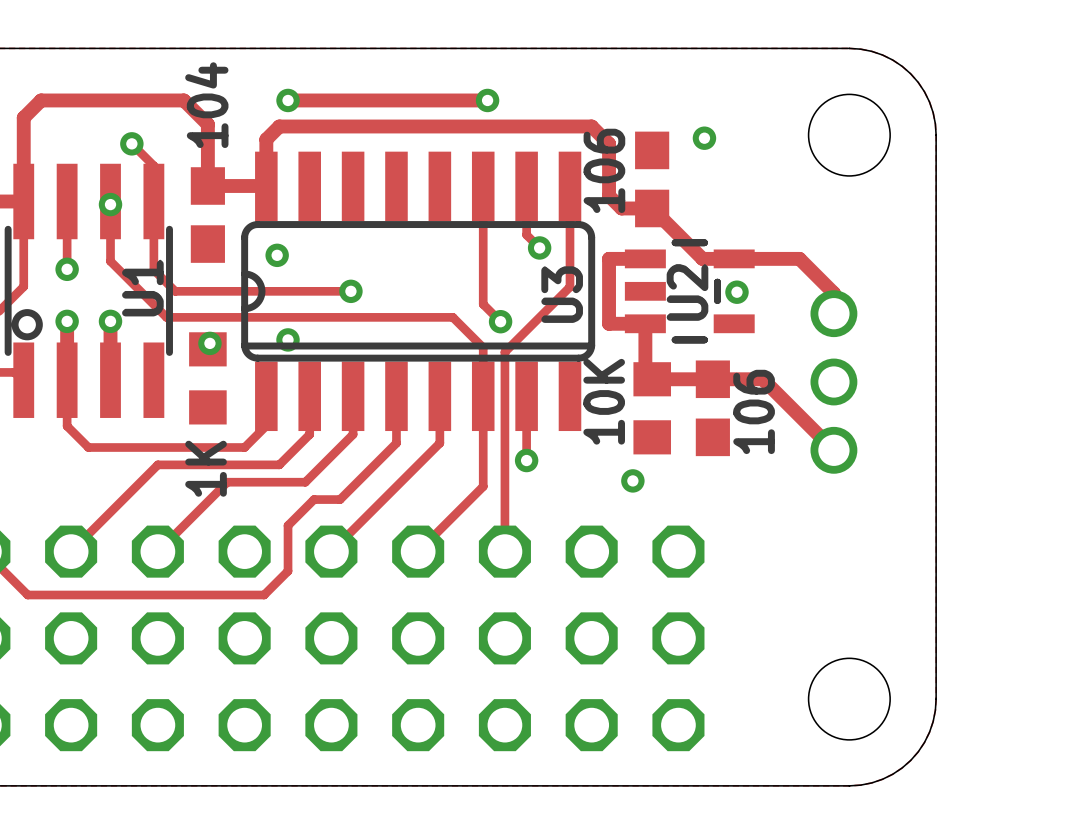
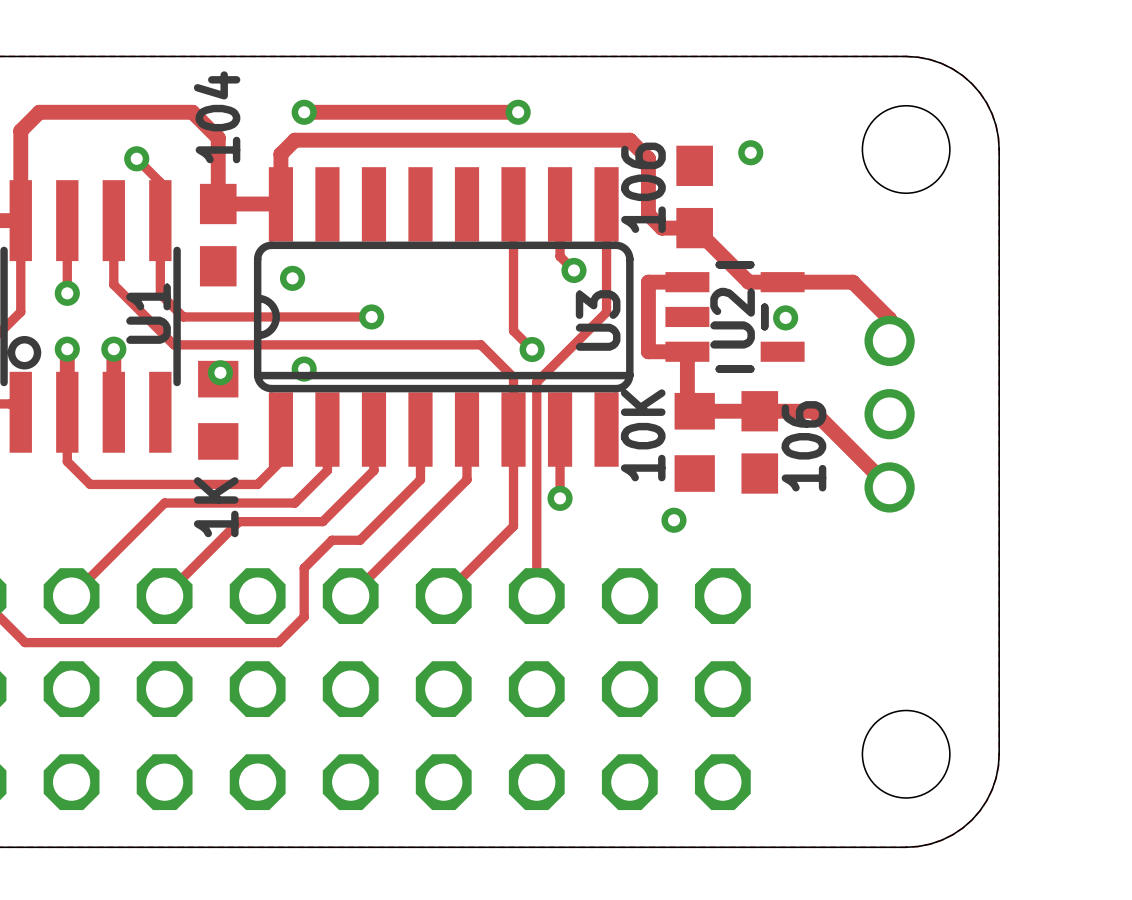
via: (110, 204) -> none

